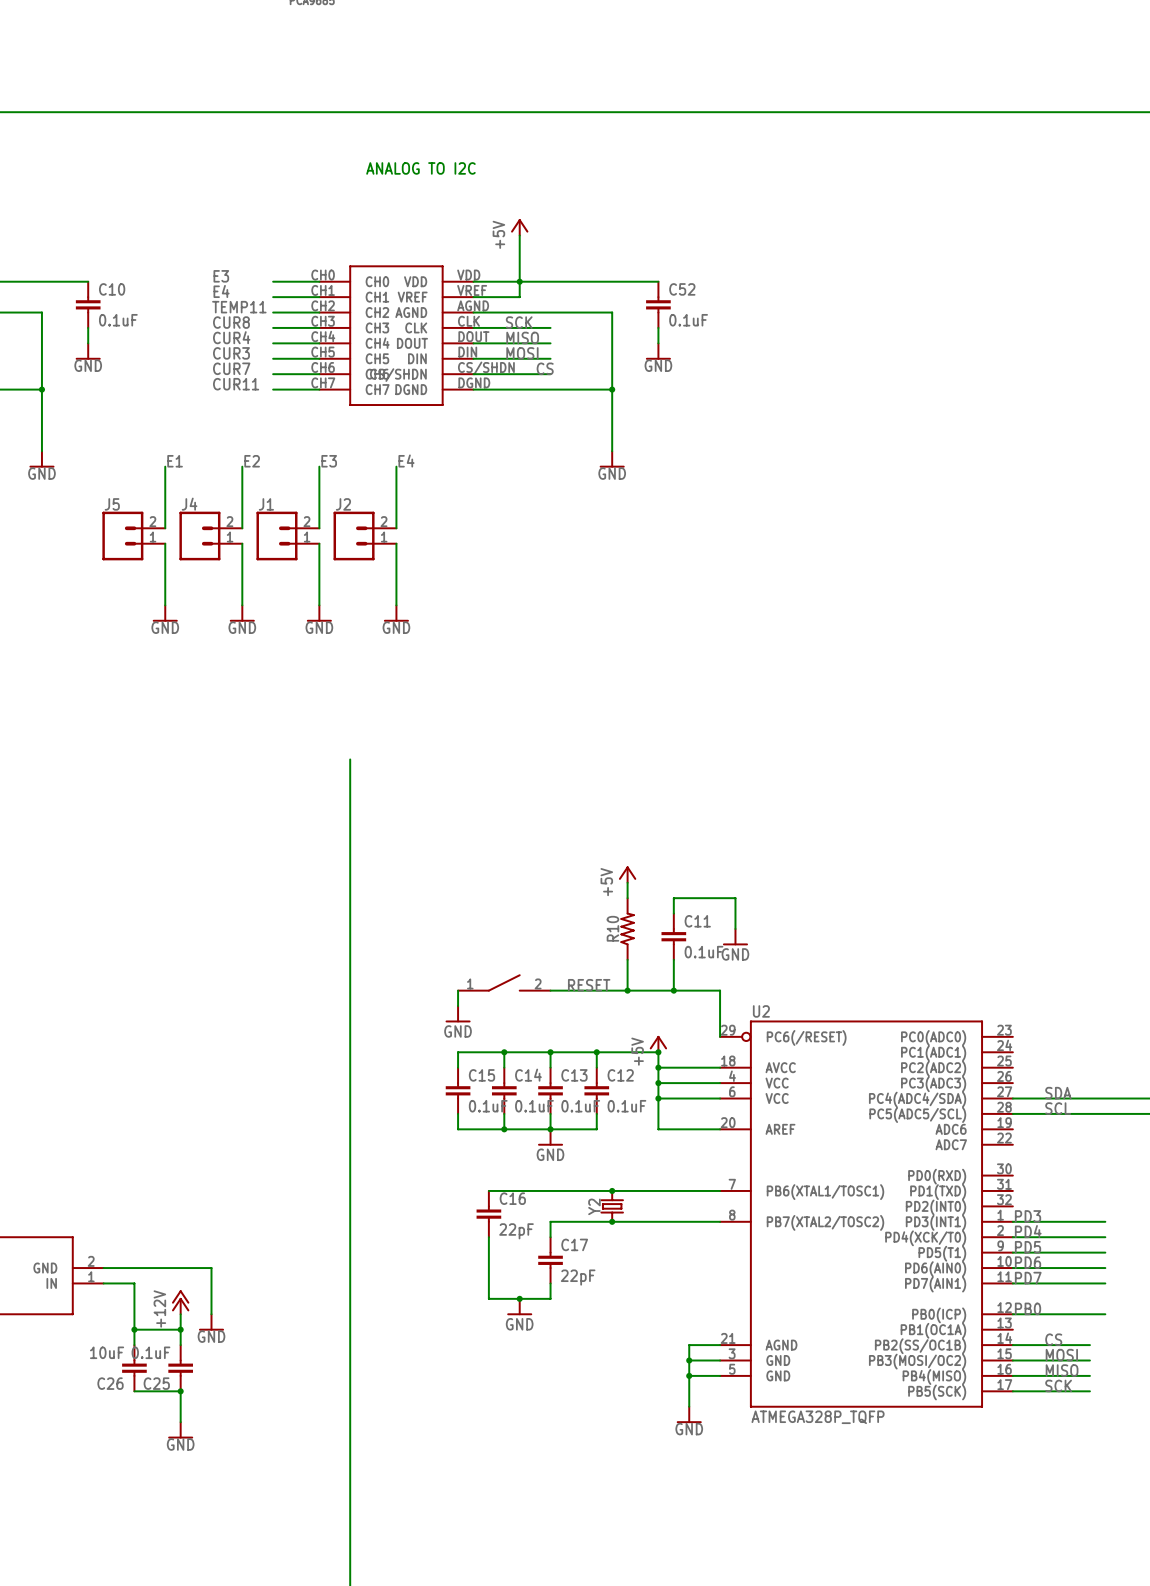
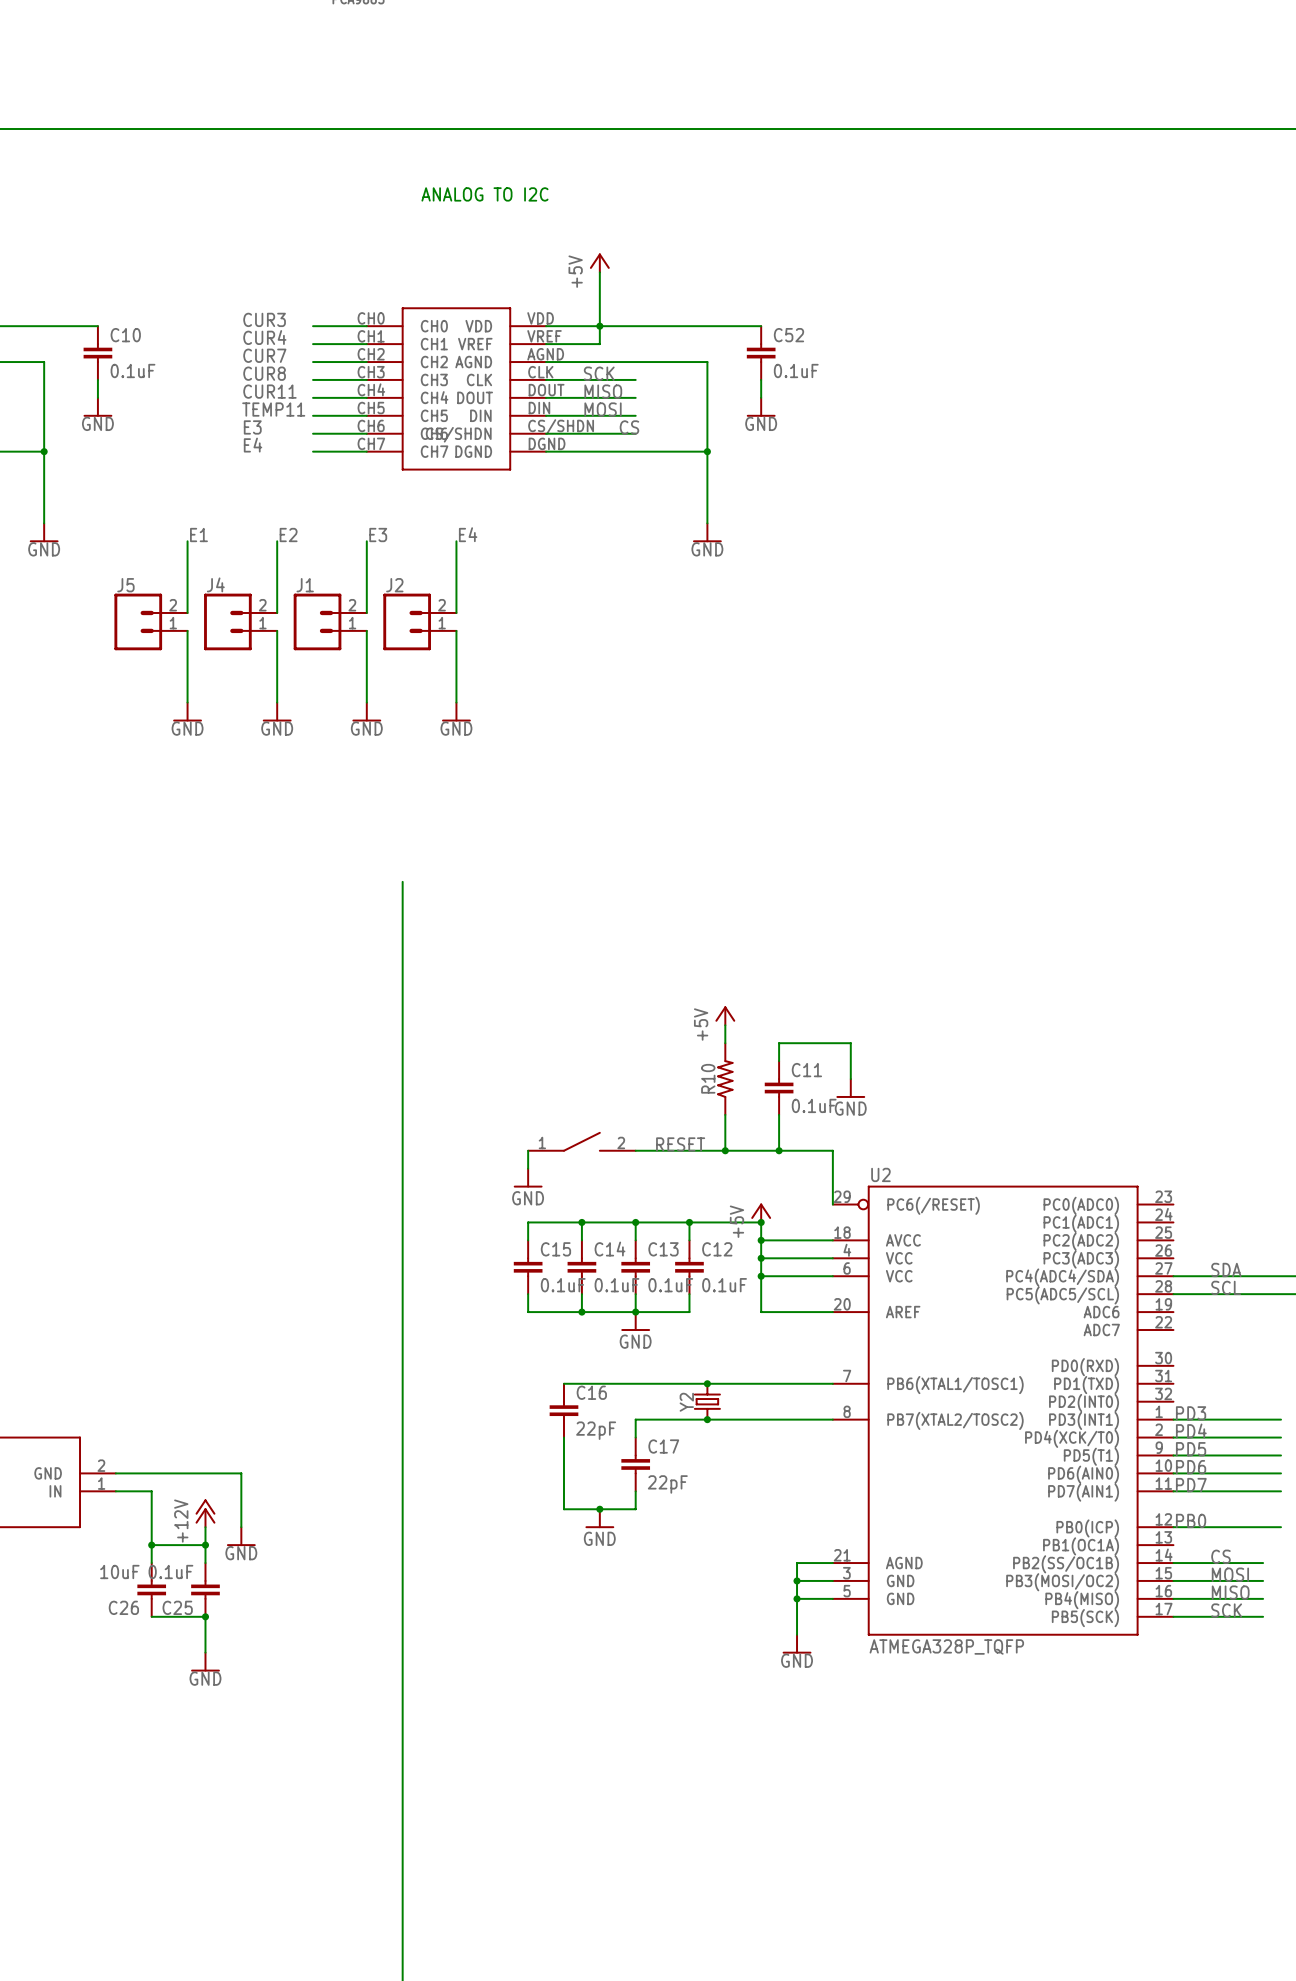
label: E3 (221, 276) -> CUR3 (264, 319)
label: E4 (221, 291) -> CUR4 (264, 337)
label: TEMP11 (239, 307) -> CUR7 (264, 355)
label: CUR4 (231, 337) -> CUR11 (269, 391)
label: CUR3 (231, 353) -> TEMP11 (273, 409)
label: CUR7 (231, 368) -> E3 (252, 427)
label: CUR11 (236, 384) -> E4 (253, 445)

